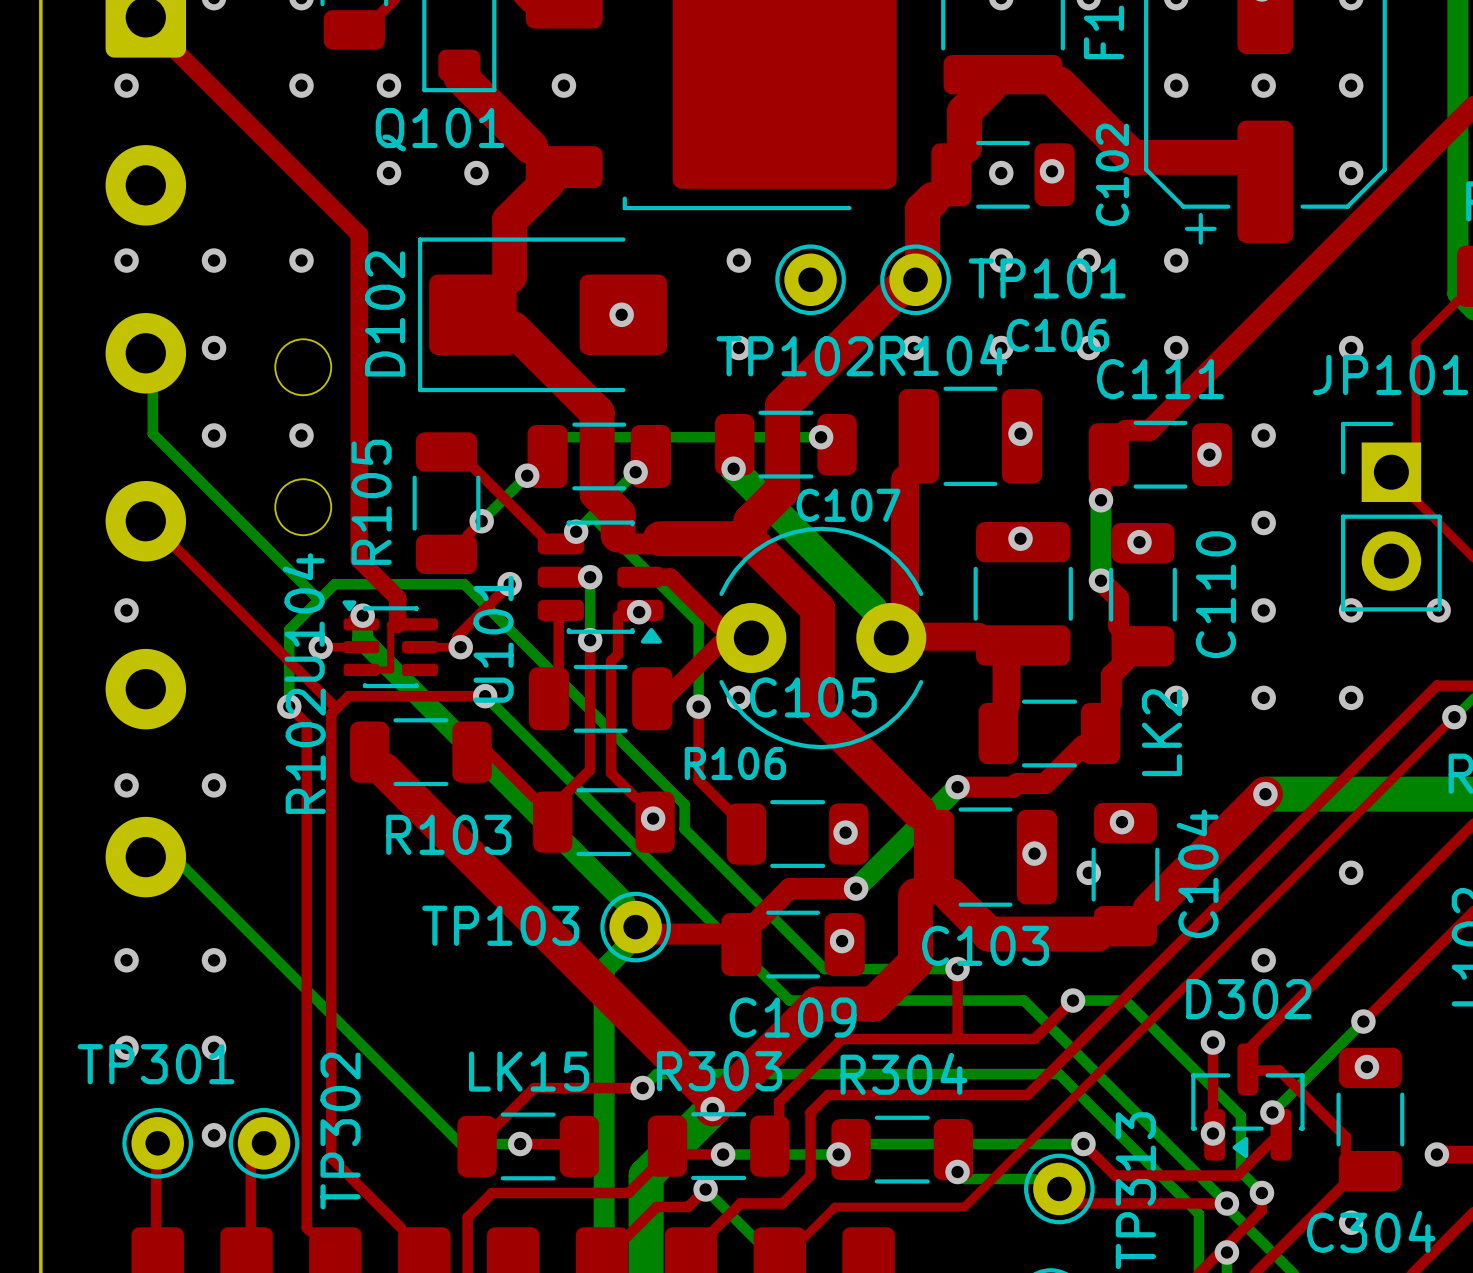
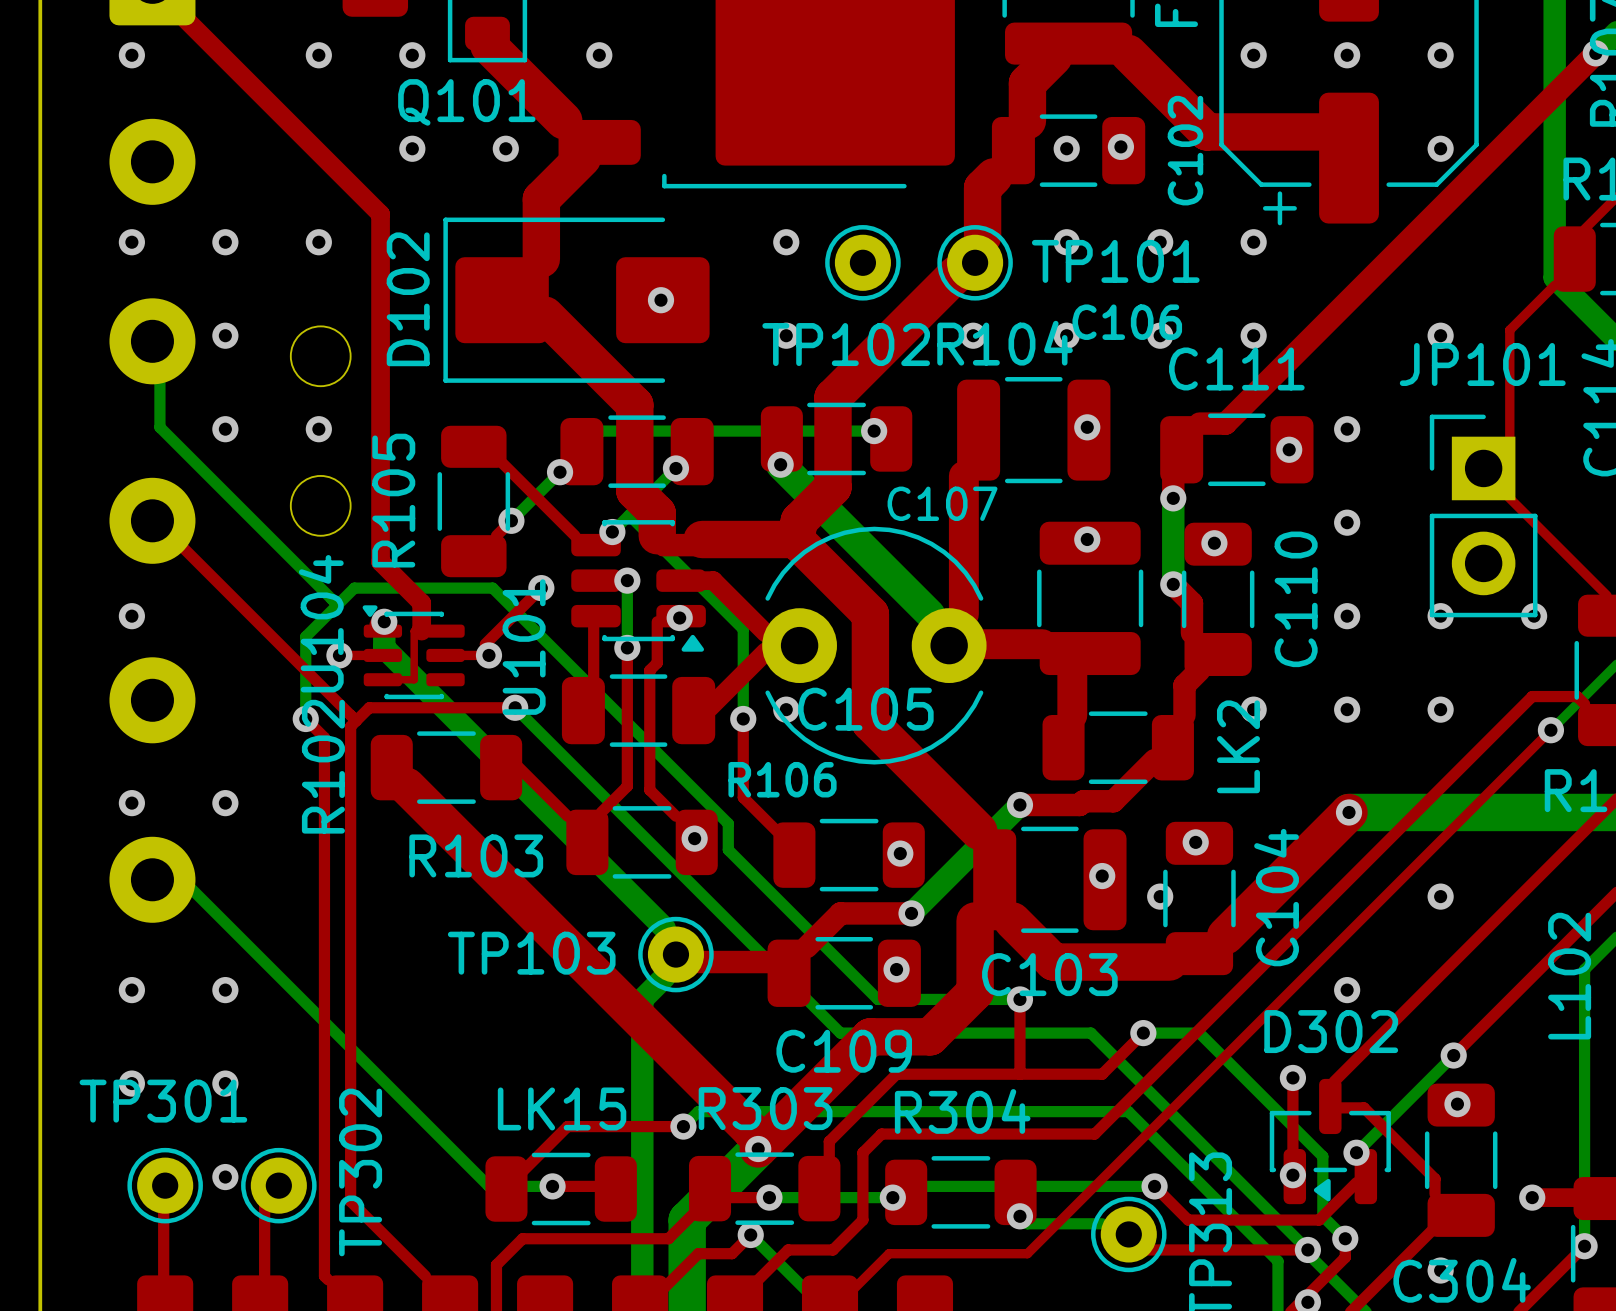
C107 name position: C107 (848, 505) -> C107 (942, 503)

